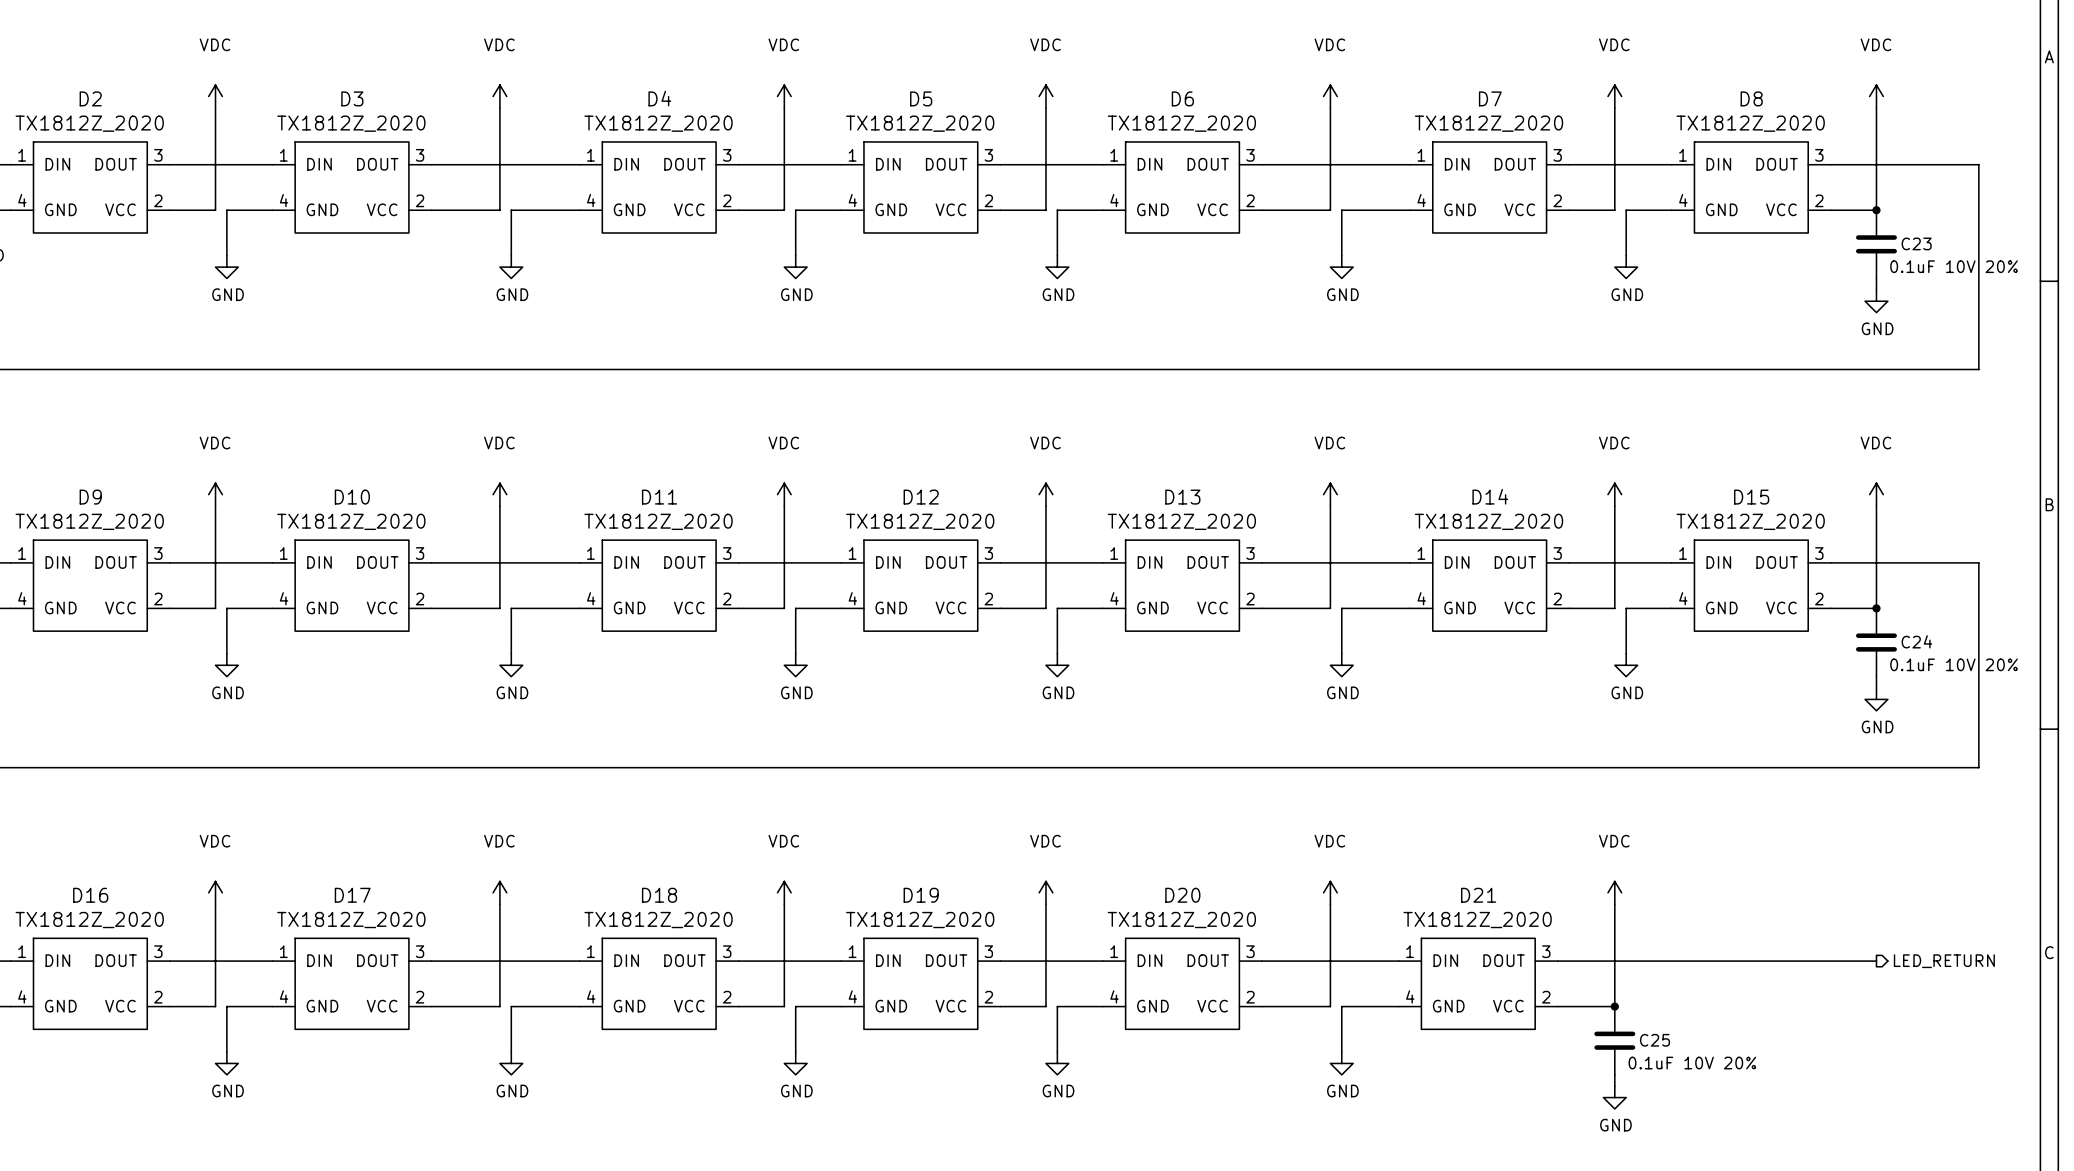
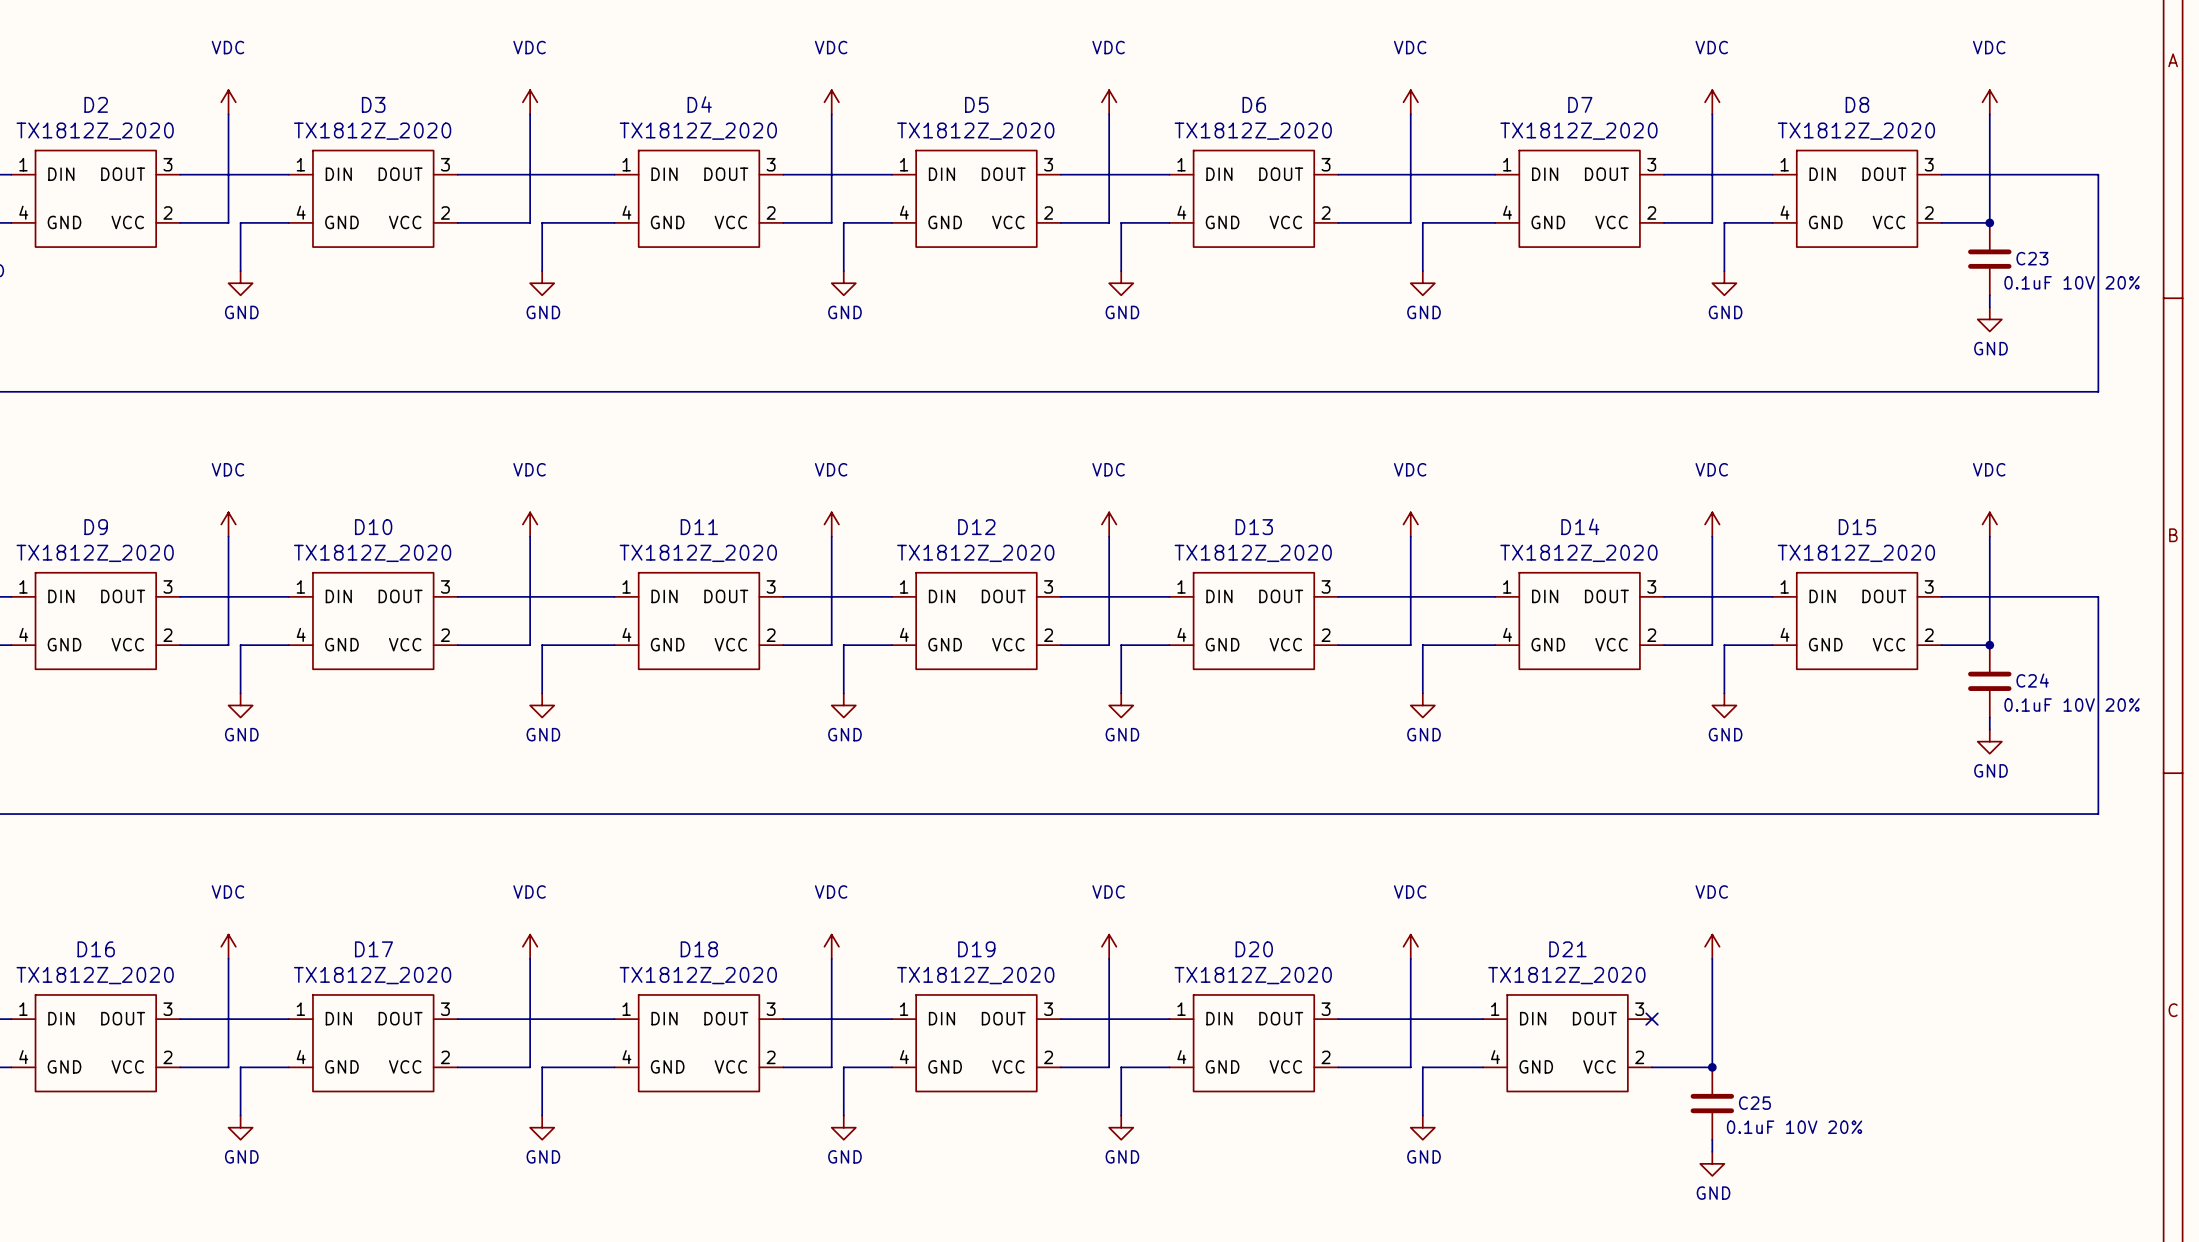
wire: (1557, 961) (1876, 961) -> none
no-connect mark: none -> (1652, 1019)
hierarchical label: LED_RETURN (1944, 961) -> none

